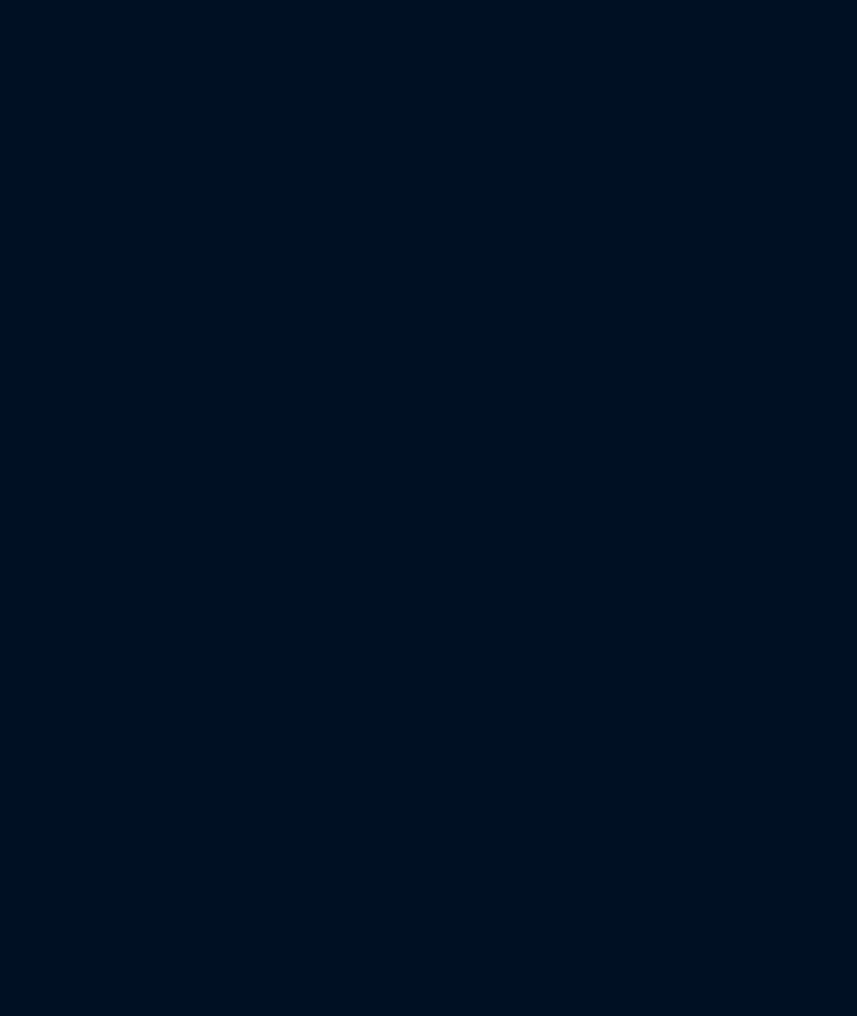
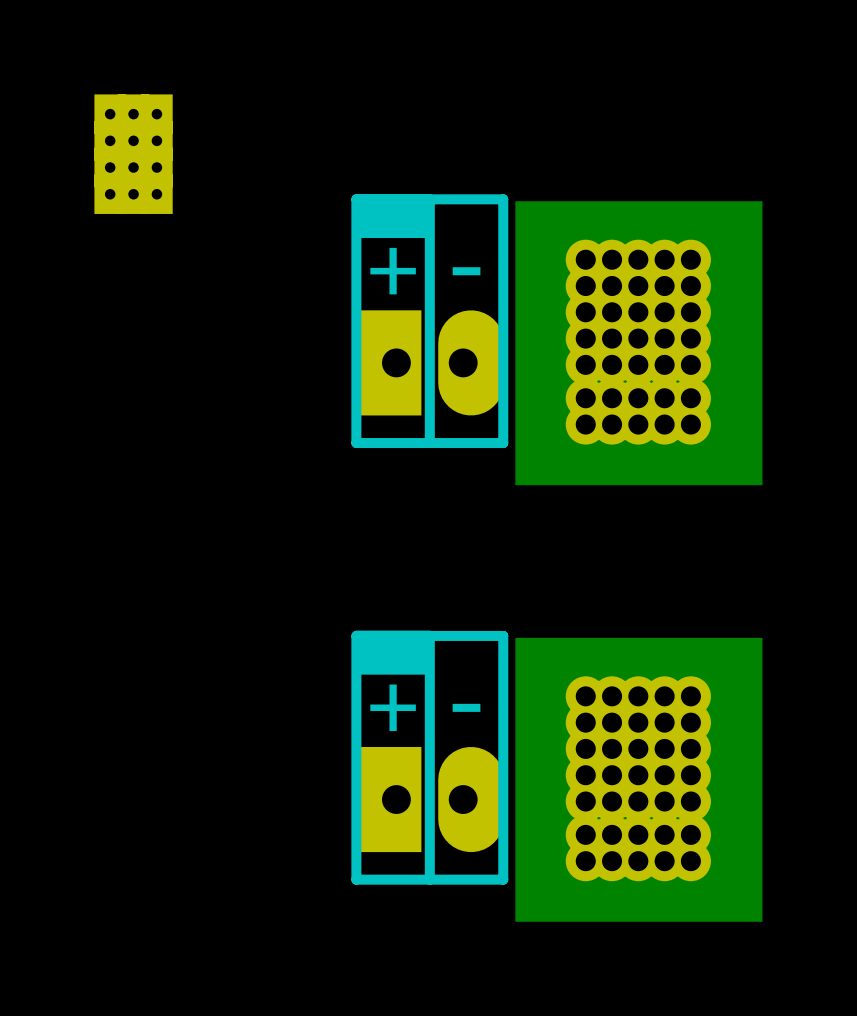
part: none -> (133, 154)
part: none -> (429, 321)
part: none -> (638, 343)
part: none -> (429, 757)
part: none -> (638, 779)

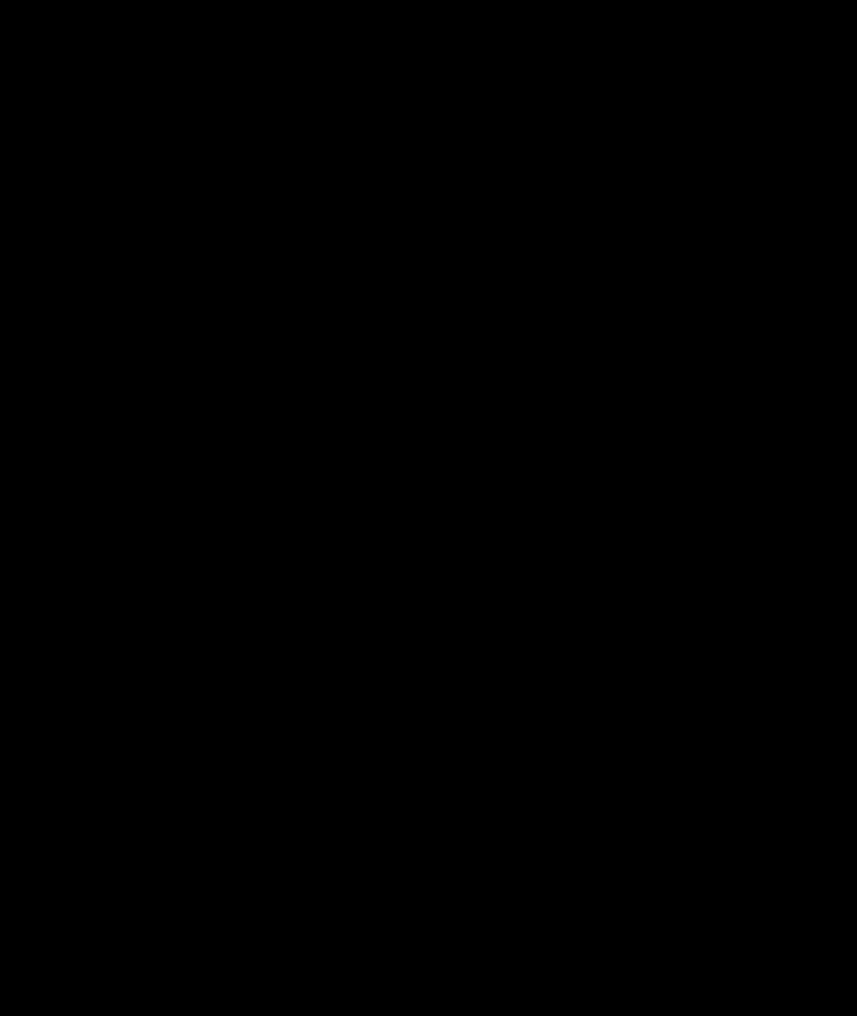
part: (133, 154) -> none
part: (429, 321) -> none
part: (638, 343) -> none
part: (429, 757) -> none
part: (638, 779) -> none

